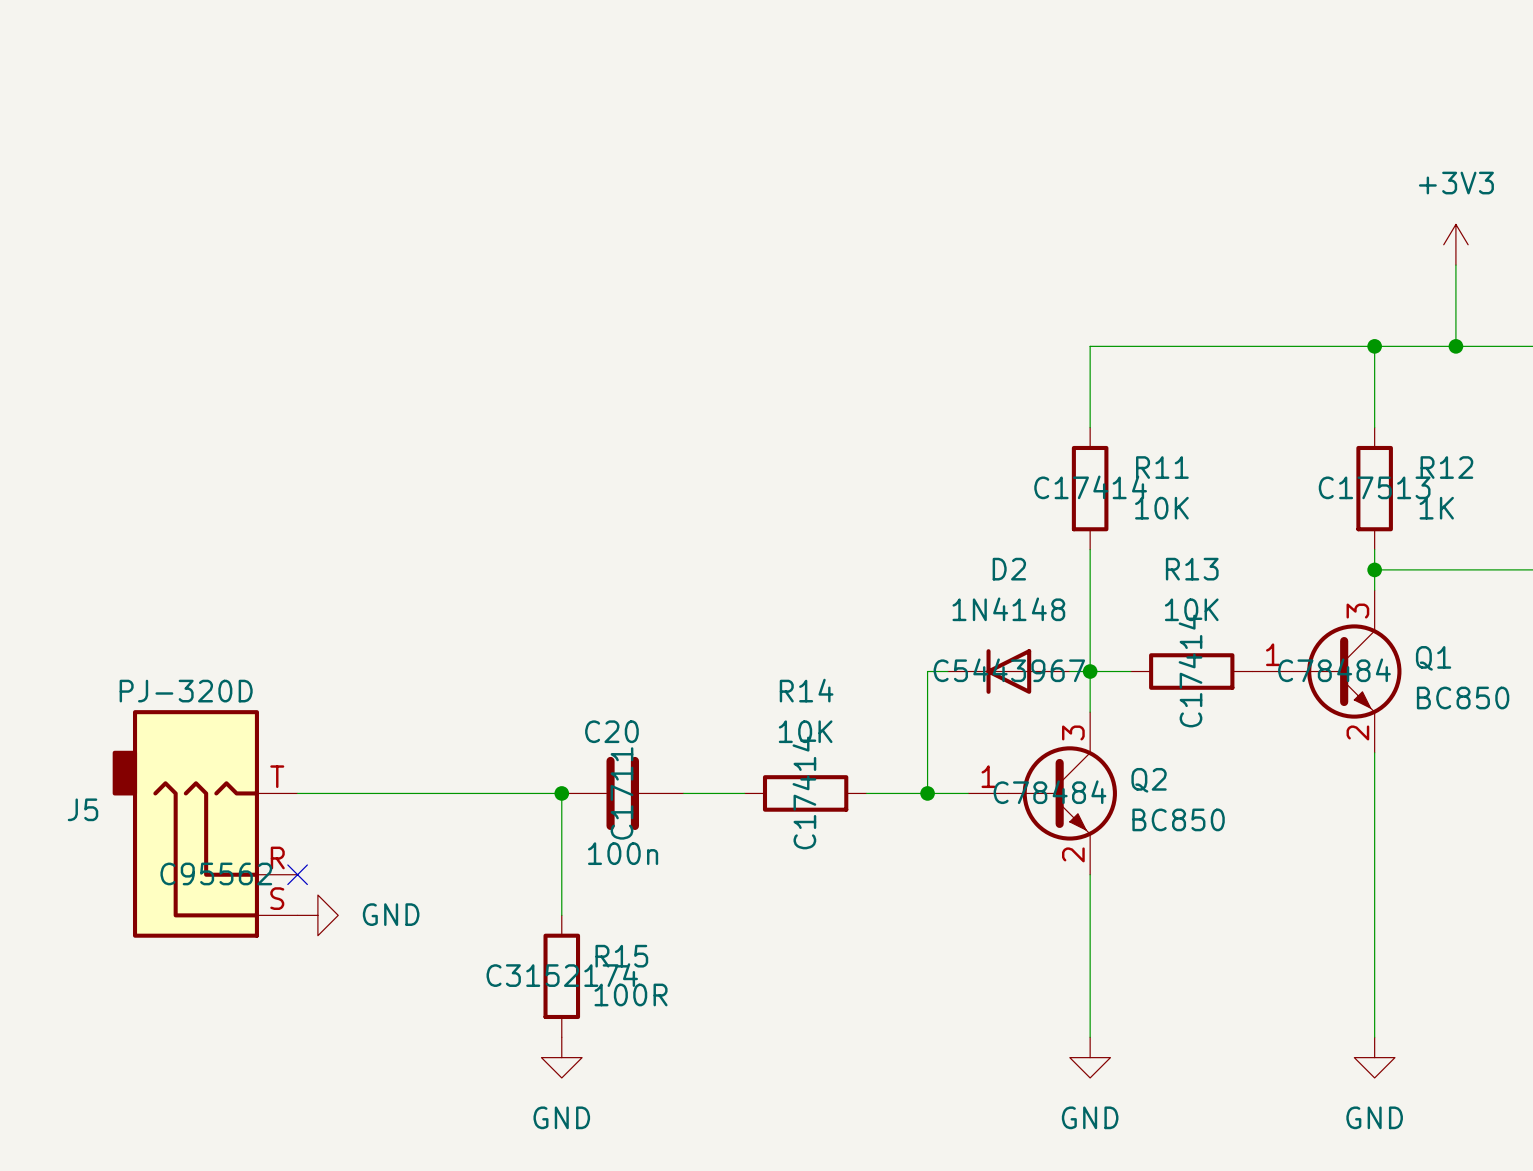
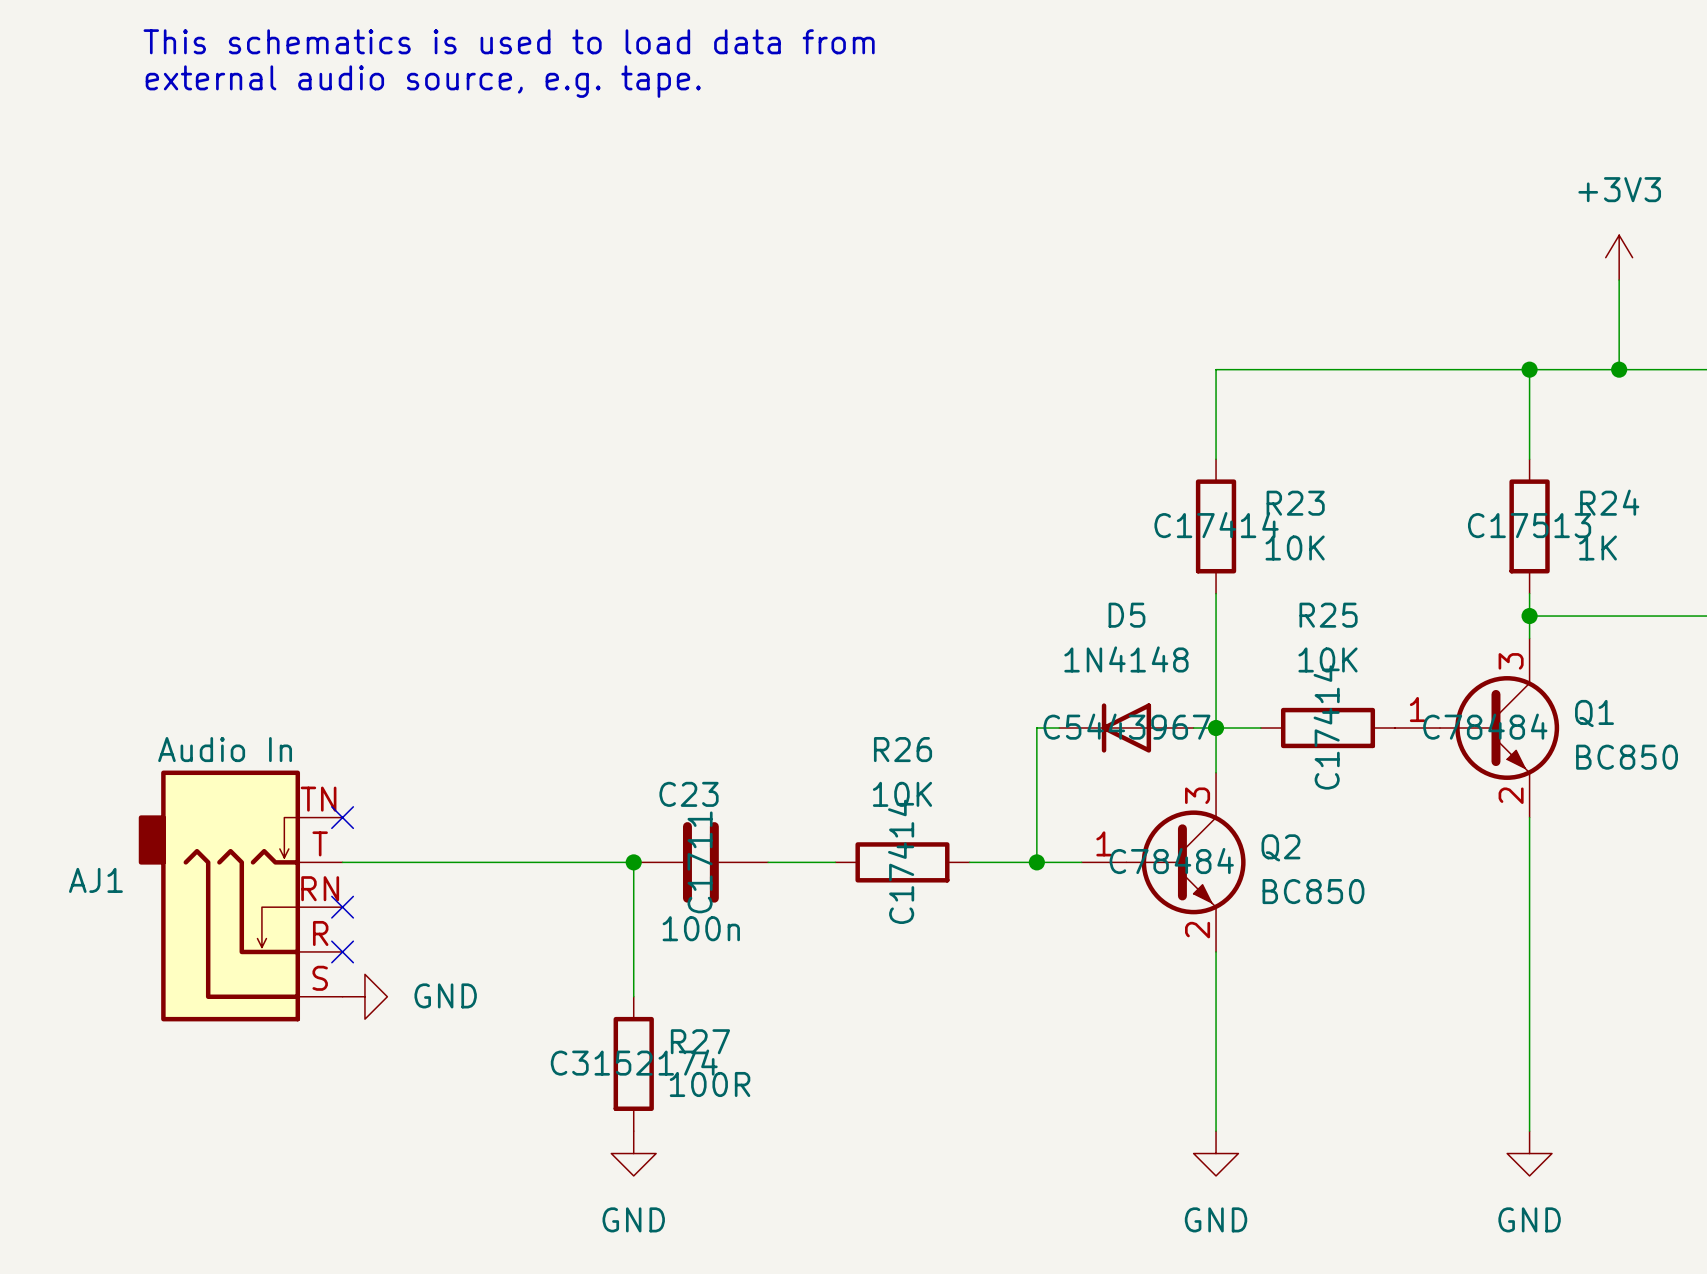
text: none -> This schematics is used to load data from (509, 41)
text: none -> external audio source, e.g. tape. (423, 81)
R11 name: R11 (1162, 467) -> R23 (1295, 503)
R12 name: R12 (1446, 467) -> R24 (1609, 502)
D2 name: D2 (1009, 569) -> D5 (1126, 615)
R13 name: R13 (1192, 569) -> R25 (1328, 615)
R14 name: R14 (806, 690) -> R26 (903, 749)
C20 name: C20 (611, 731) -> C23 (689, 794)
no-connect mark: none -> (342, 817)
J5: PJ-320D (205, 823) -> none
AJ1: none -> Audio In (240, 895)
no-connect mark: none -> (342, 907)
R15 name: R15 (621, 956) -> R27 (700, 1041)

